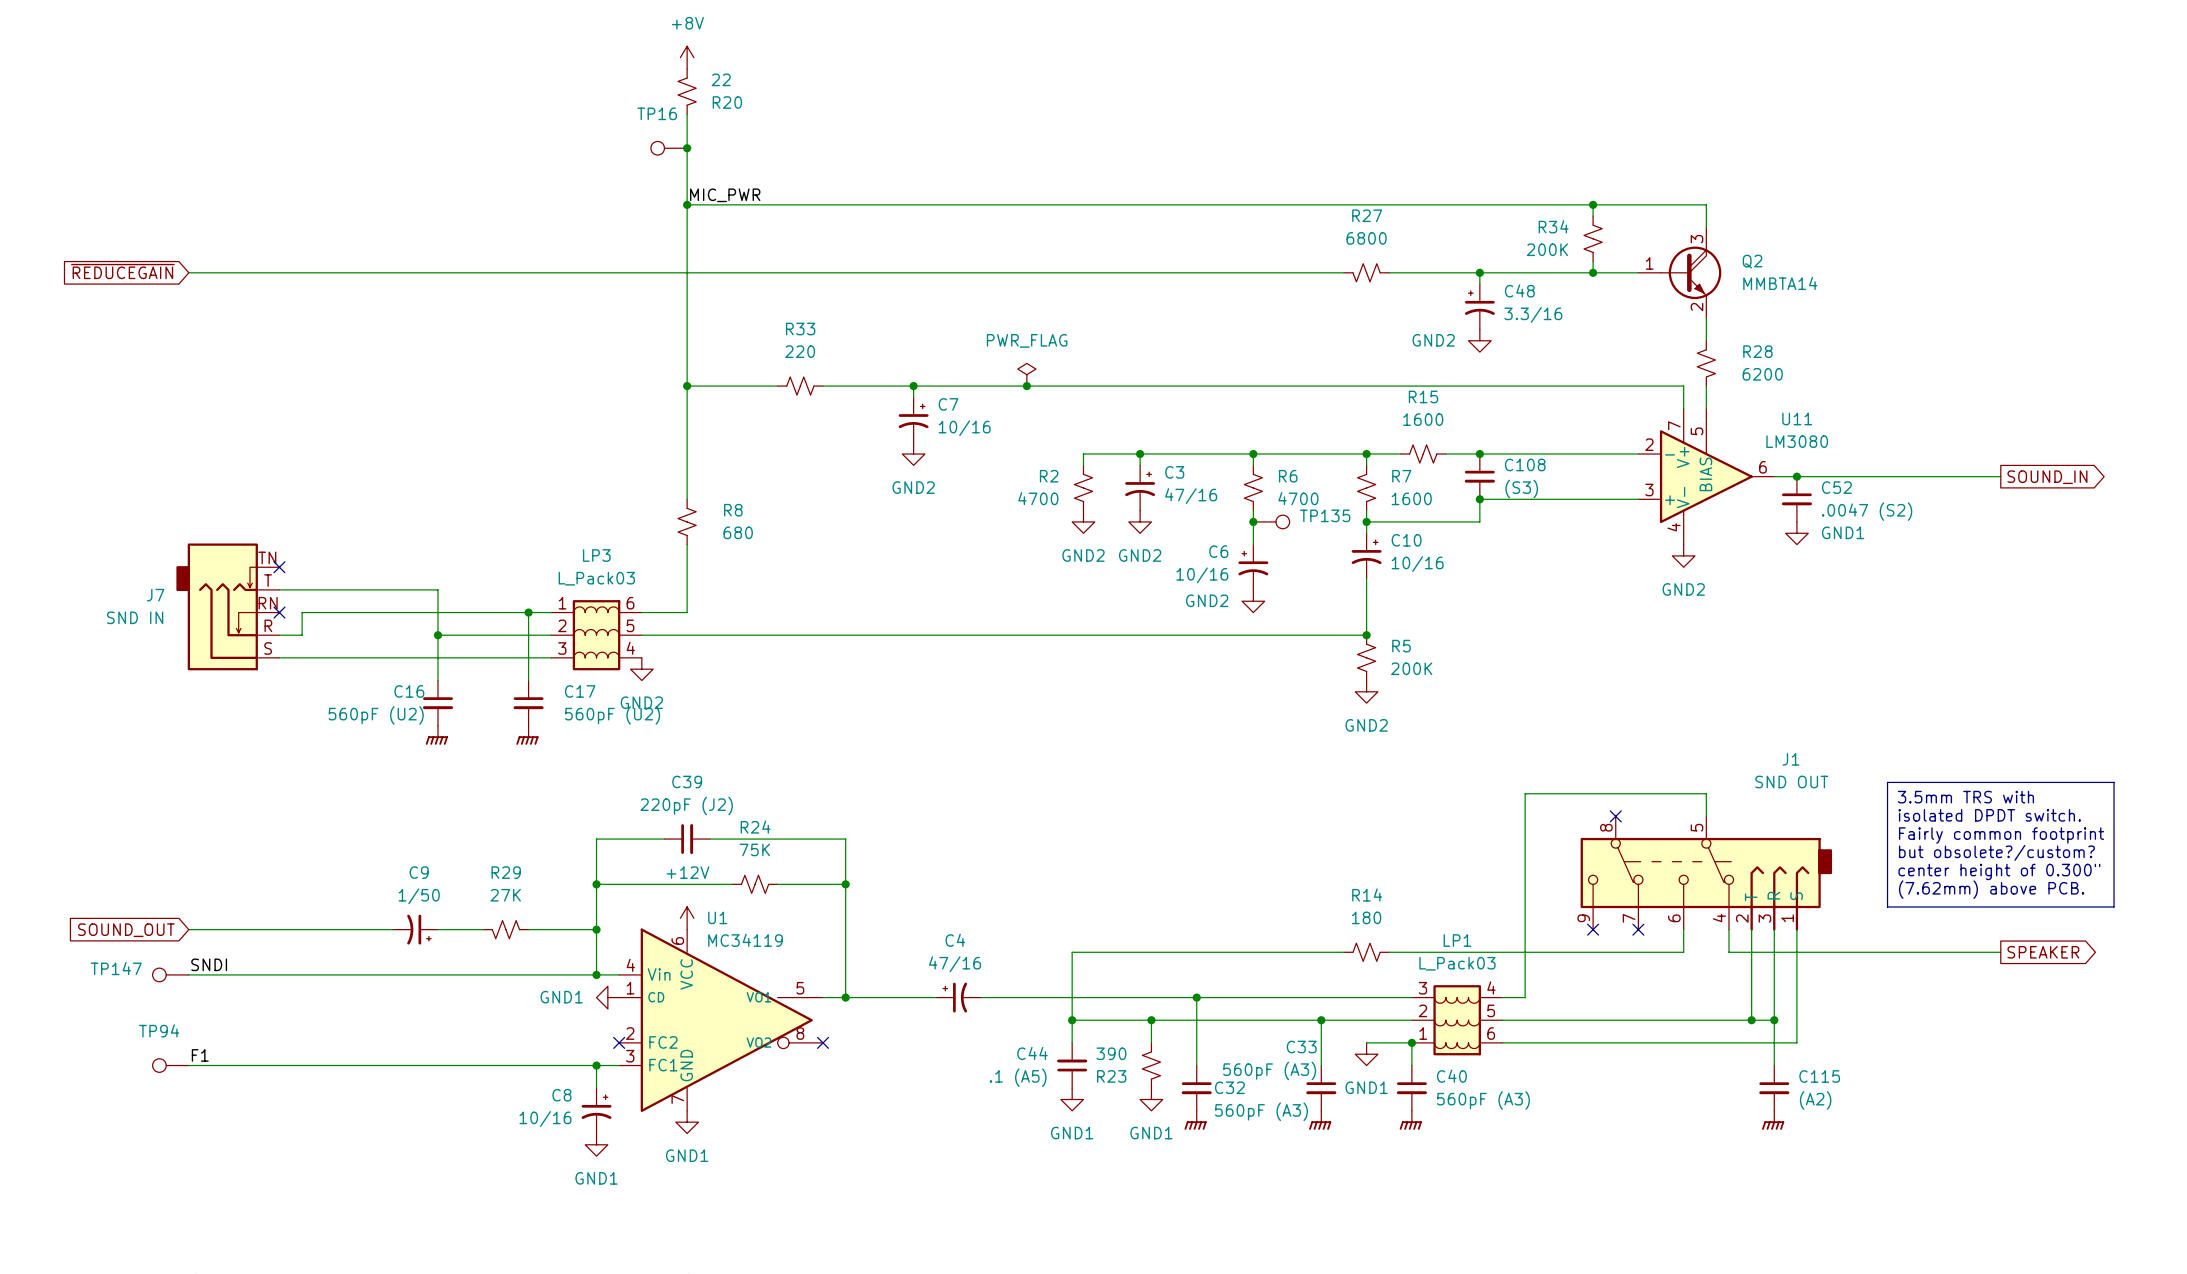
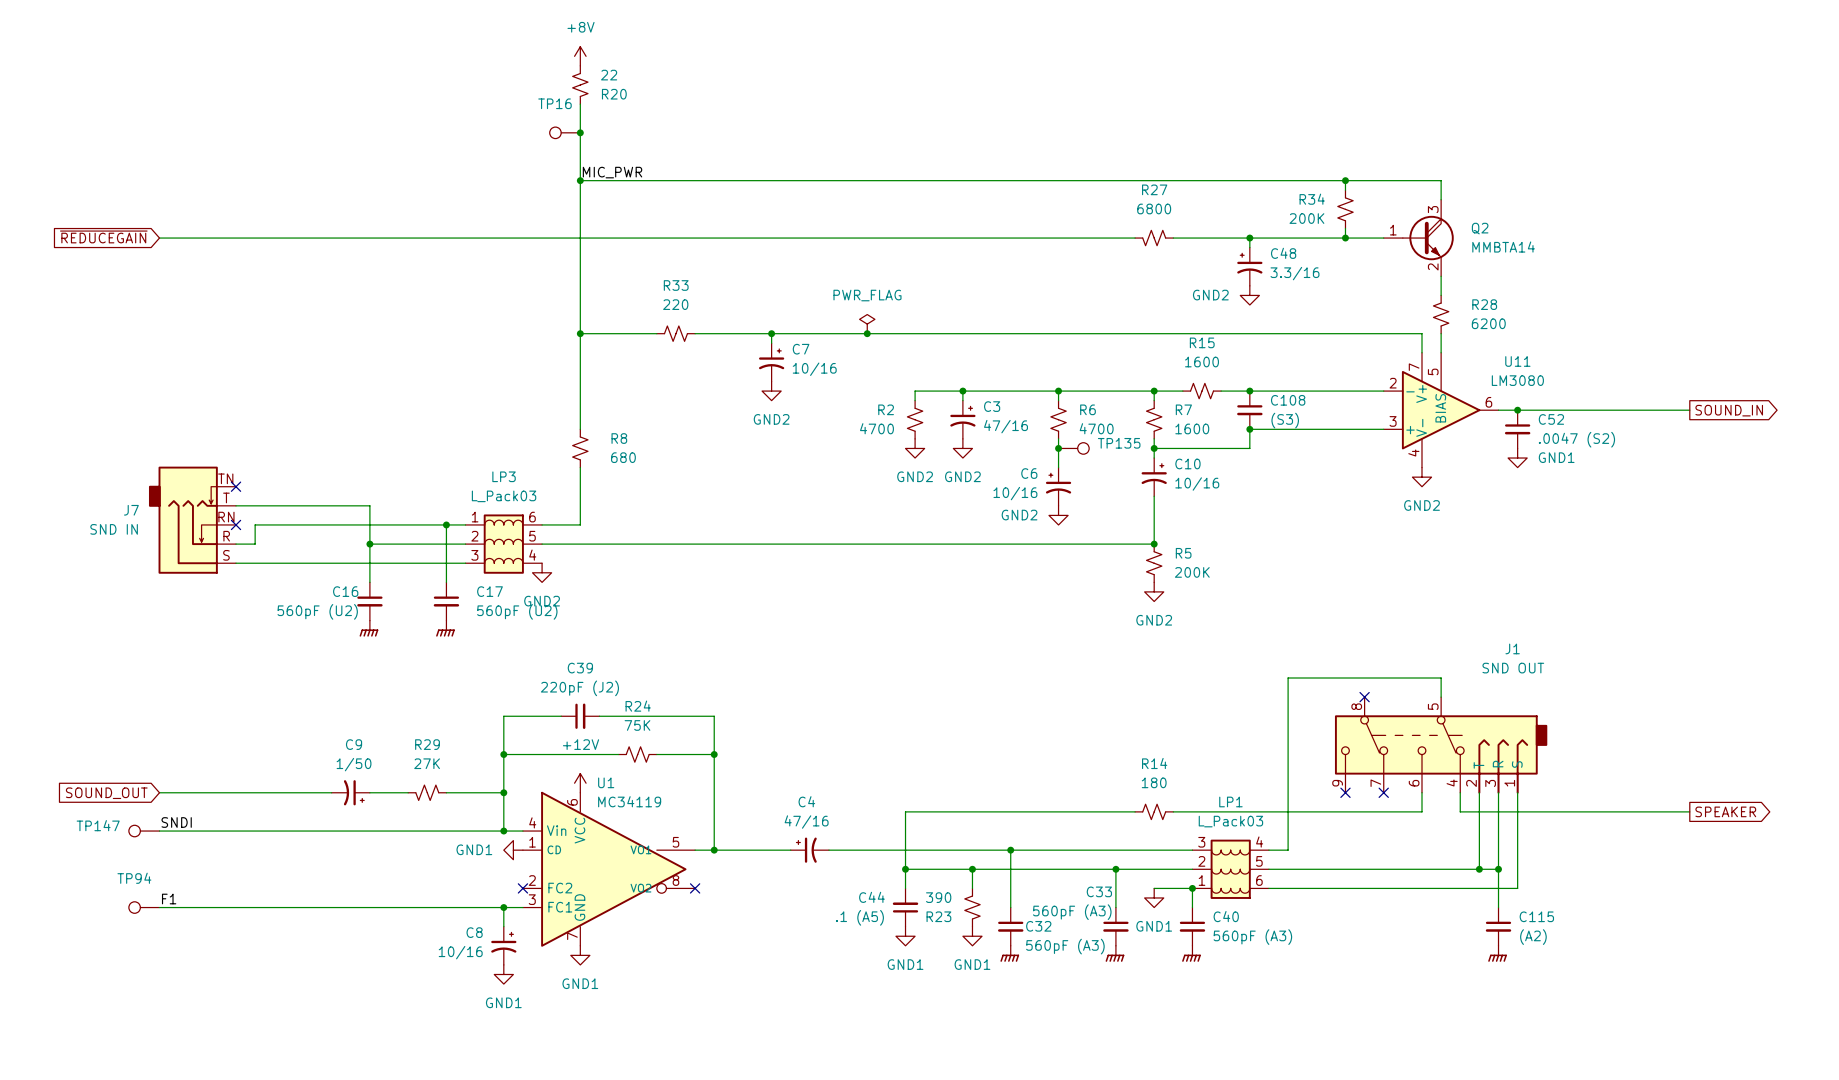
line: (1887, 782) (2114, 782) (2114, 906) (1887, 906) (1887, 782) -> none
text: 3.5mm TRS with (1965, 797) -> none
text: isolated DPDT switch. (1989, 815) -> none
text: Fairly common footprint (2001, 835) -> none
text: but obsolete?/custom? (1996, 852) -> none
text: center height of 0.300" (1999, 871) -> none
text: (7.62mm) above PCB. (1991, 889) -> none

